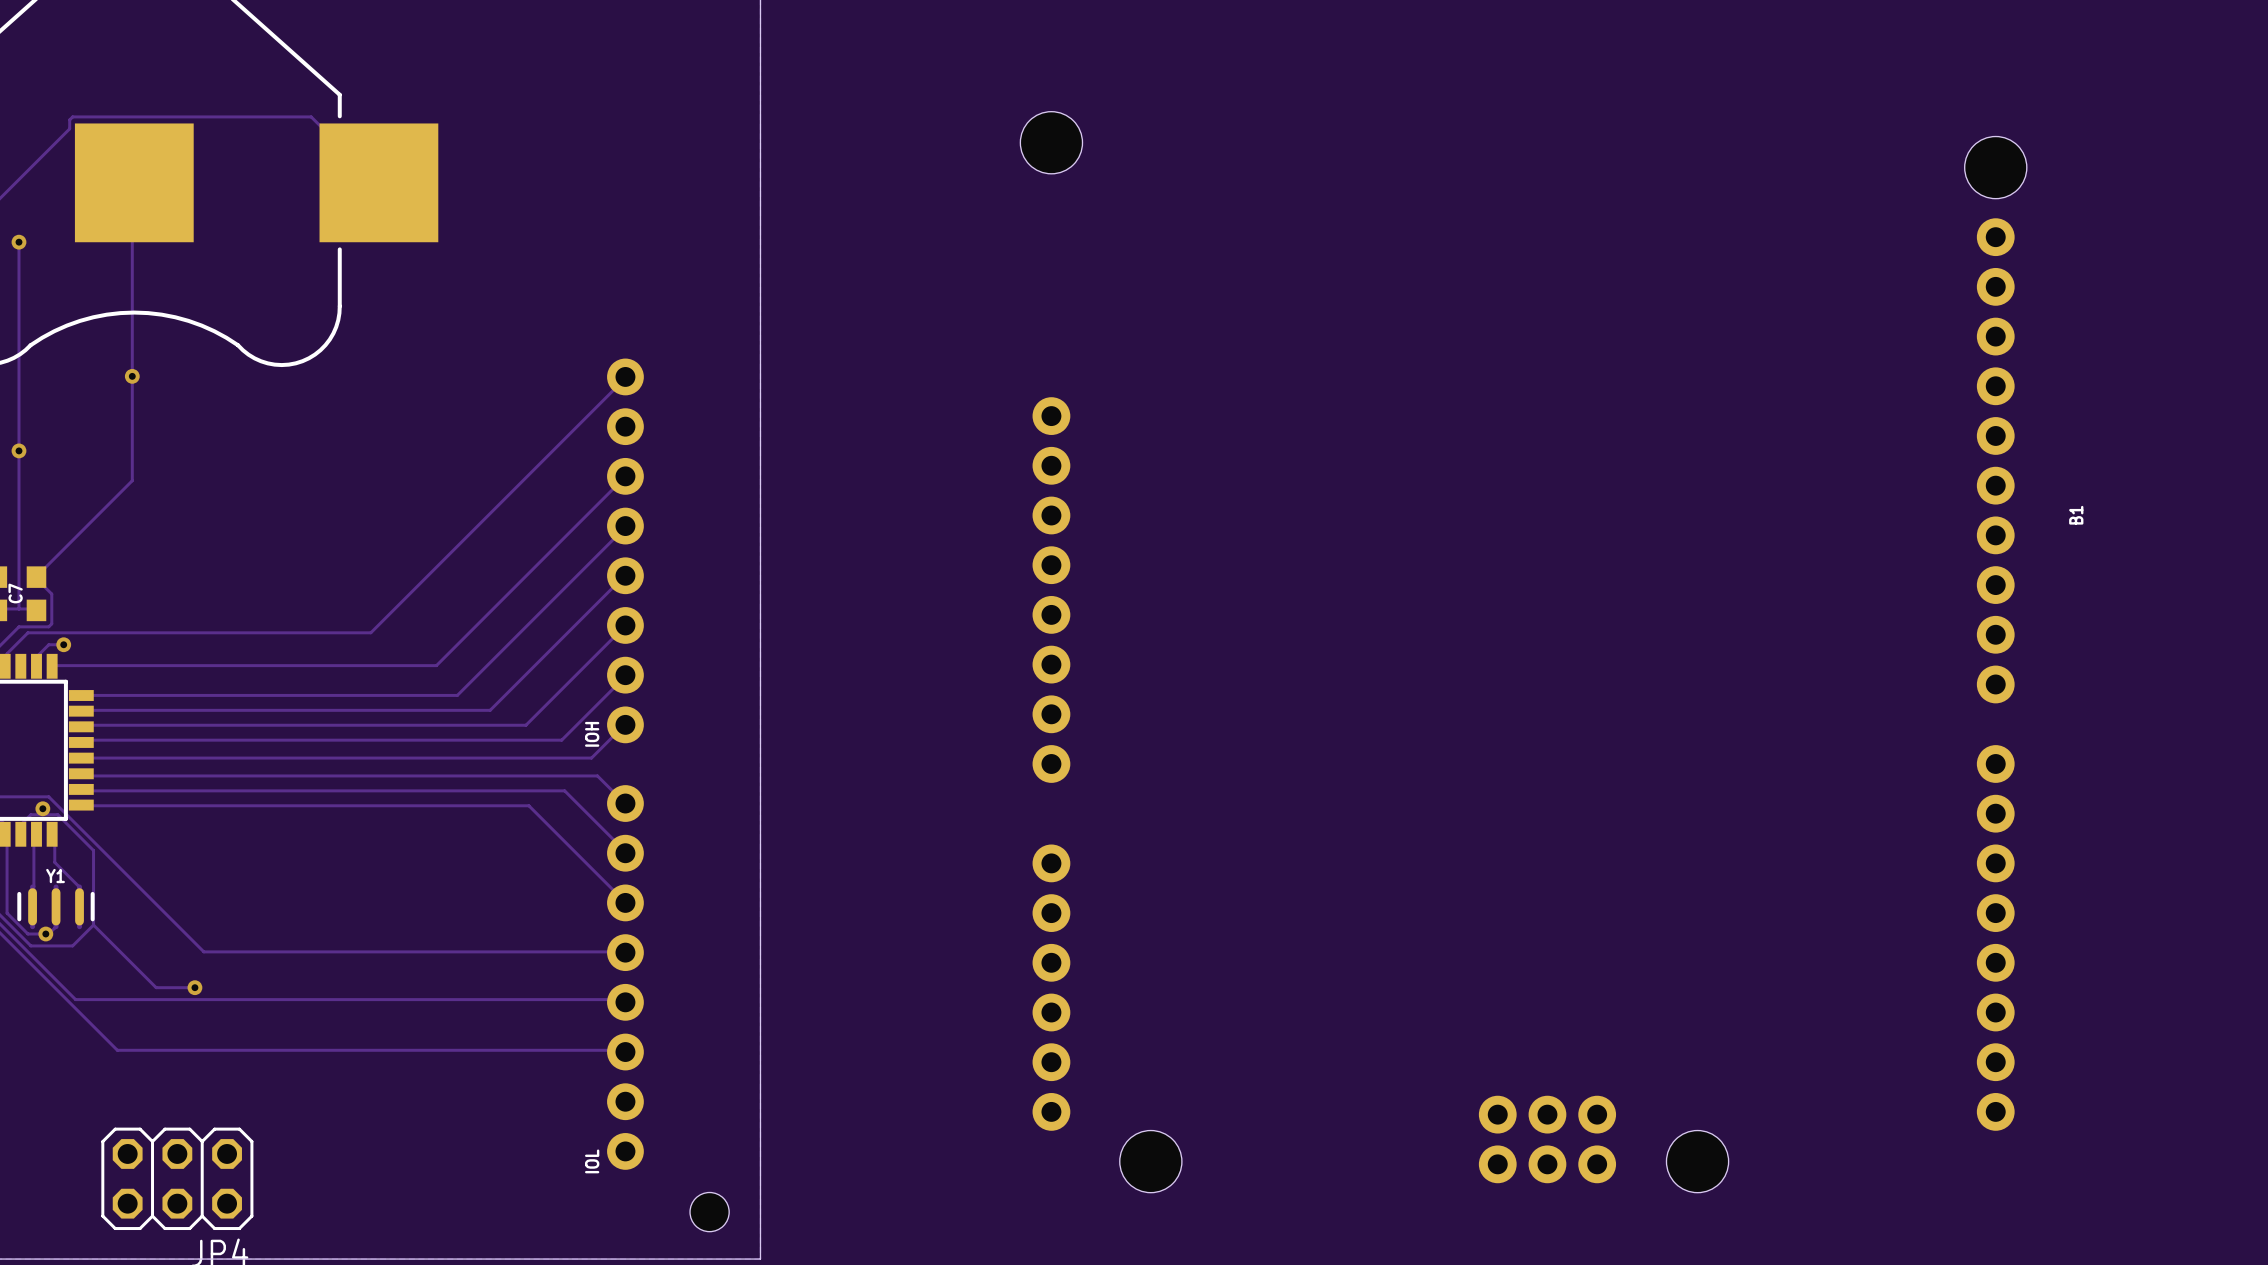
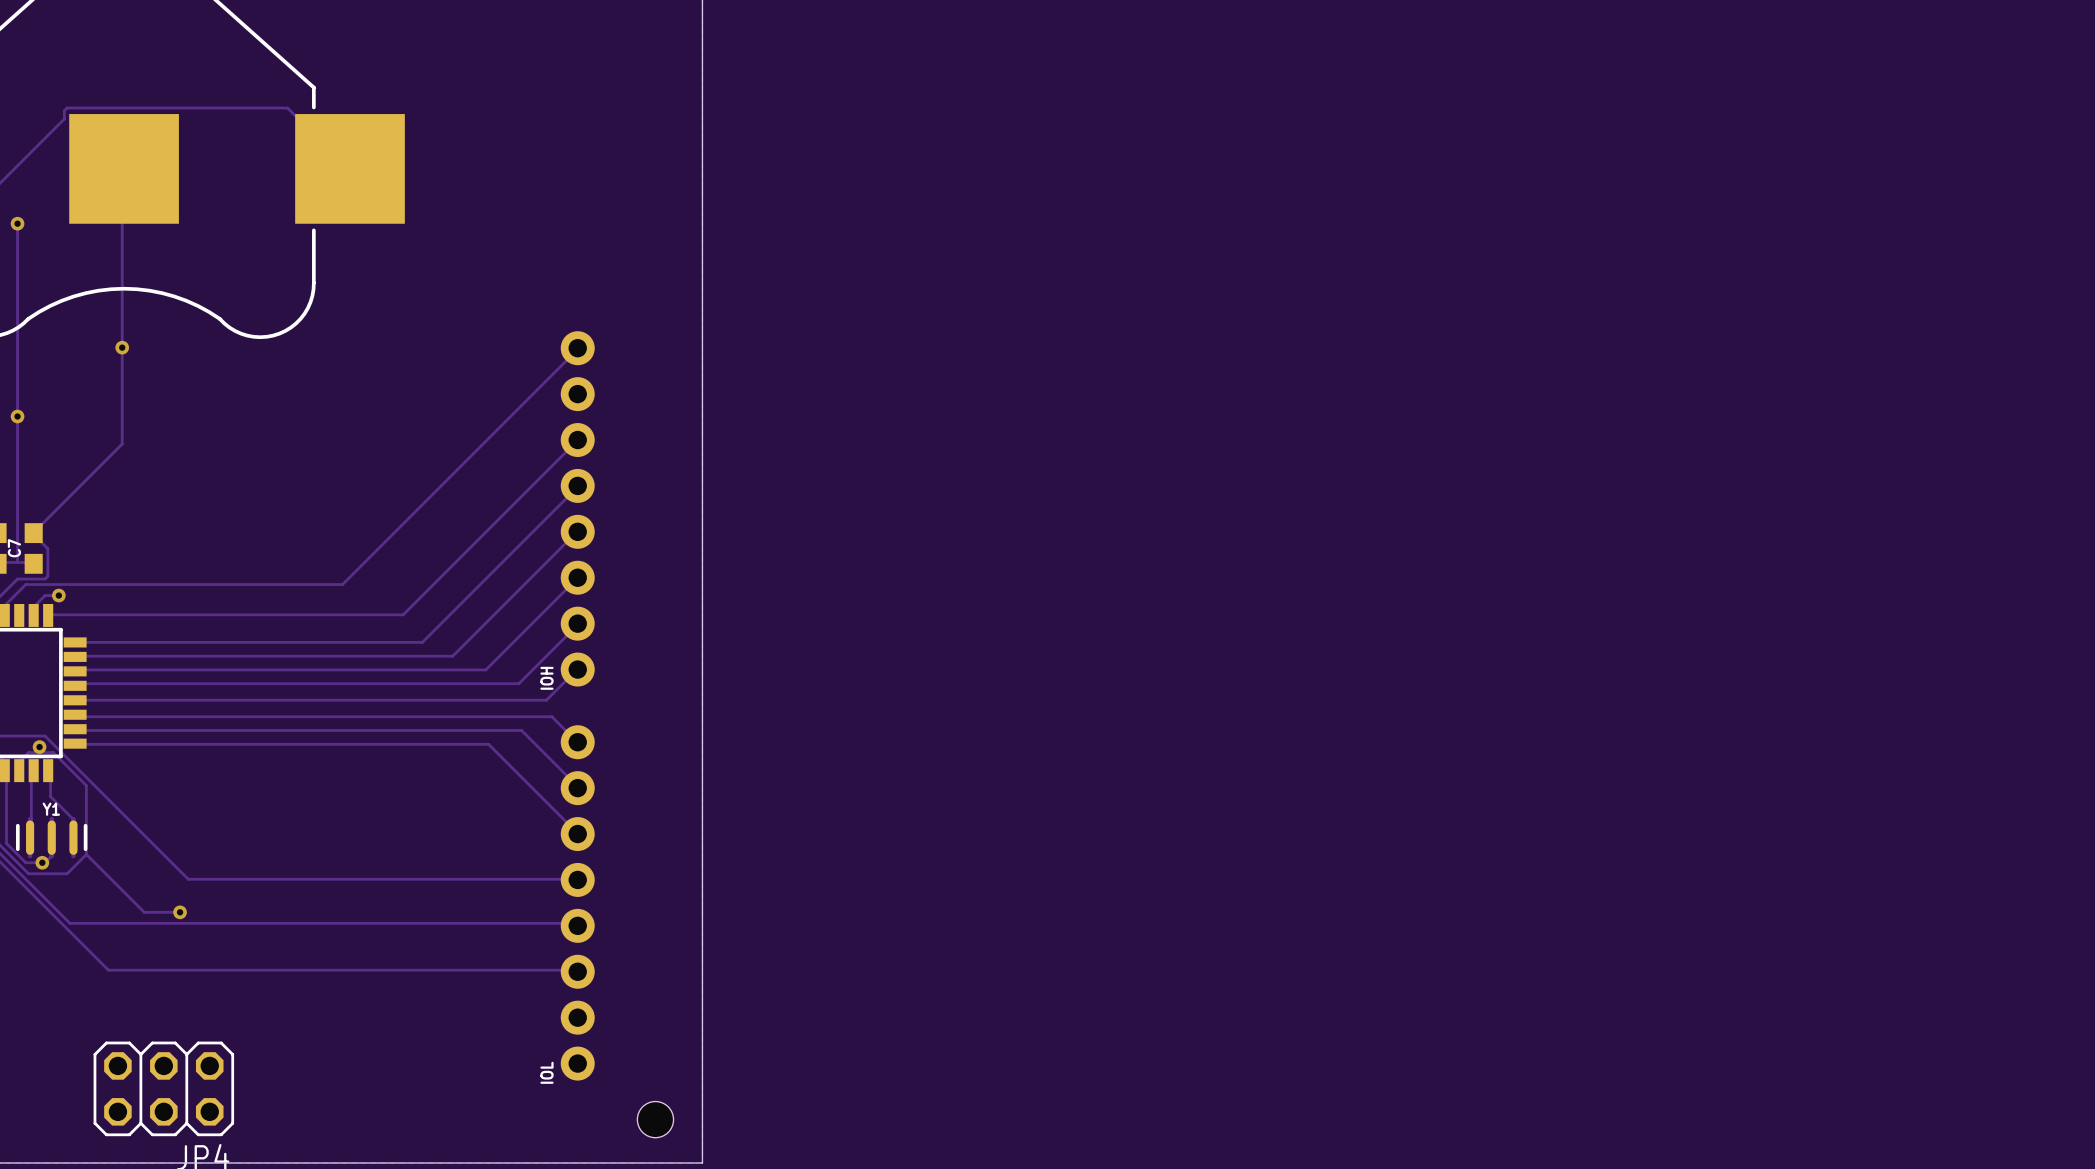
B1: (1523, 652) -> none

